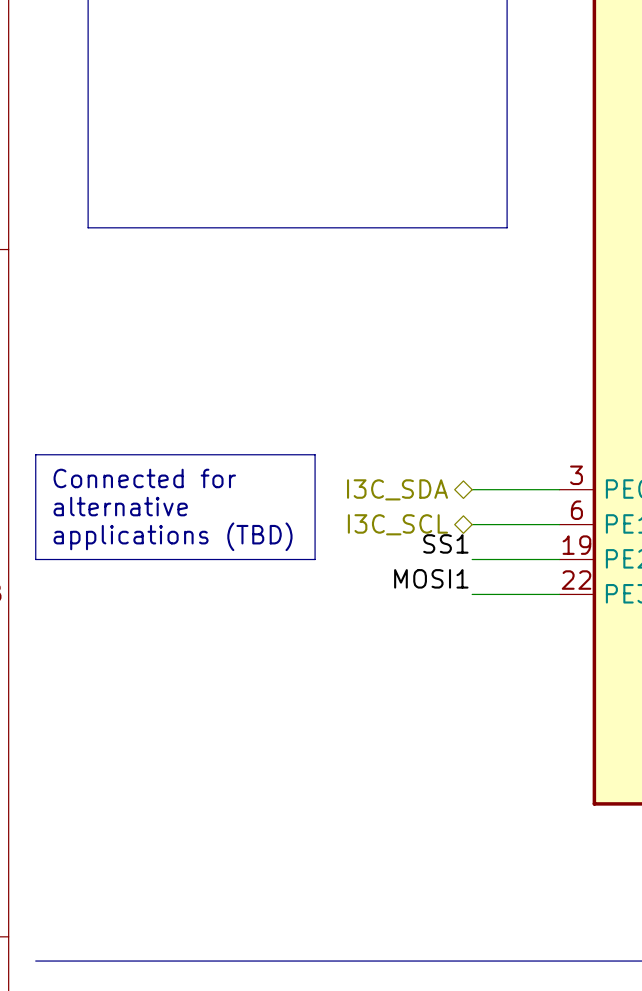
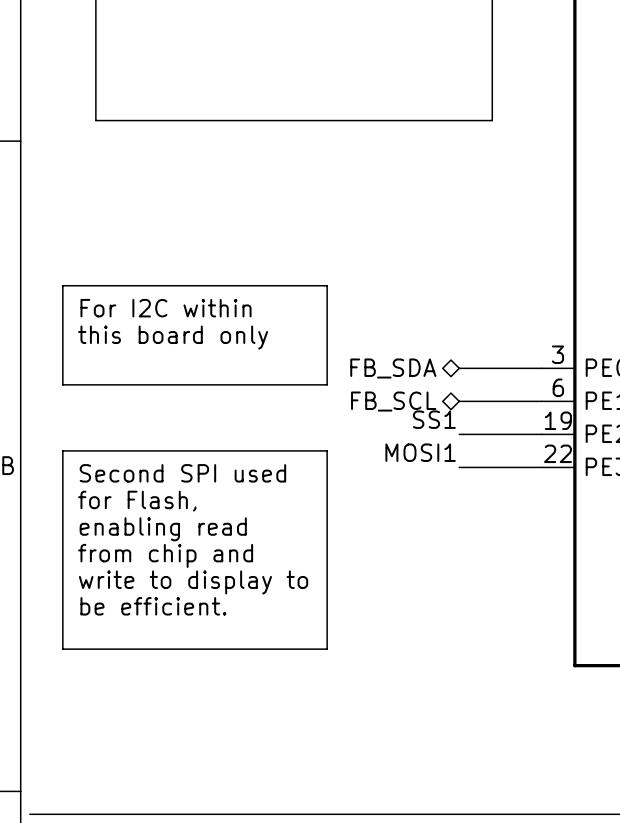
text: none -> For I2C within (166, 308)
line: (35, 454) (315, 454) (315, 559) (35, 559) (35, 454) -> (62, 285) (327, 285) (327, 384) (62, 384) (62, 285)
text: none -> this board only (173, 337)
text: Connected for (144, 478) -> none
hierarchical label: I3C_SDA (397, 489) -> FB_SDA (393, 368)
text: alternative (120, 506) -> none
hierarchical label: I3C_SCL (397, 524) -> FB_SCL (393, 401)
text: applications (TBD) (173, 536) -> none
line: none -> (62, 450) (327, 450) (327, 649) (62, 649) (62, 450)
text: none -> Second SPI used (182, 473)
text: none -> for Flash, (137, 501)
text: none -> enabling read (163, 529)
text: none -> from chip and (165, 555)
text: none -> write to display to (193, 582)
text: none -> be efficient. (153, 606)
line: none -> (29, 814) (46, 814)

